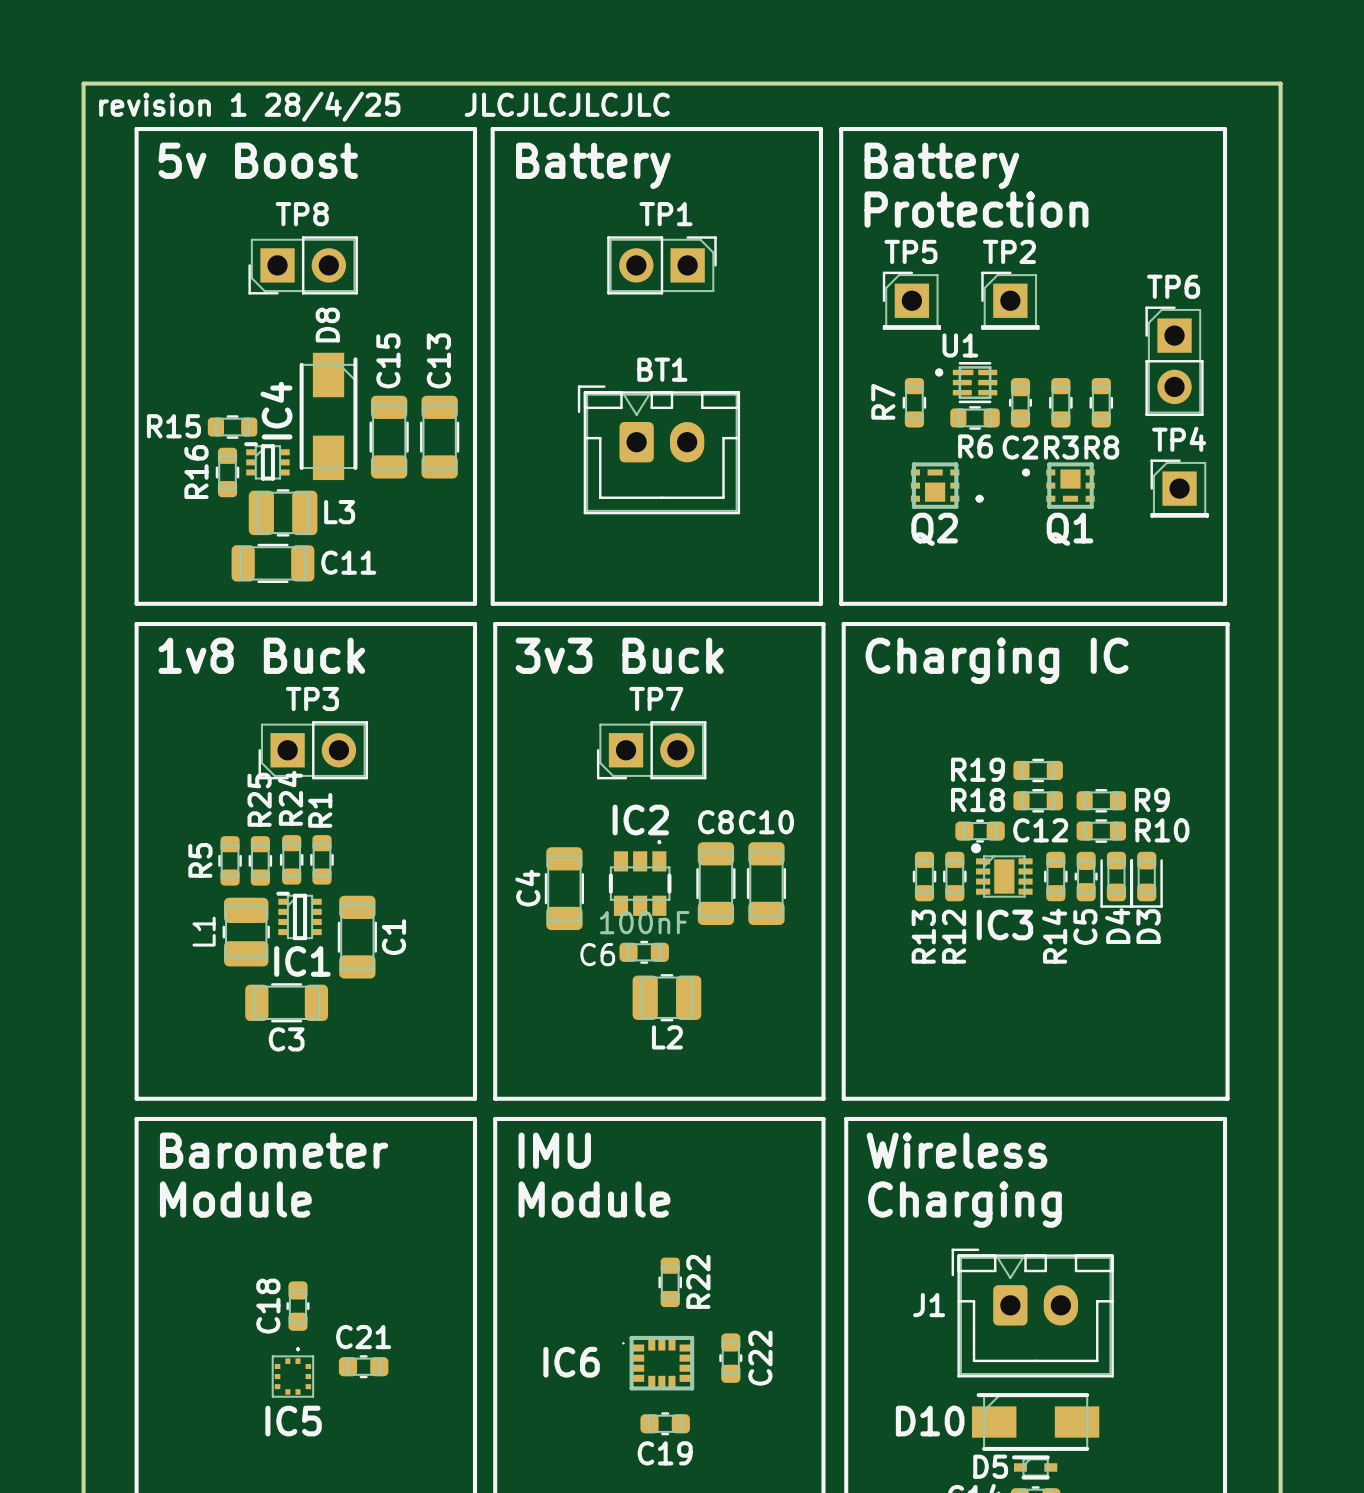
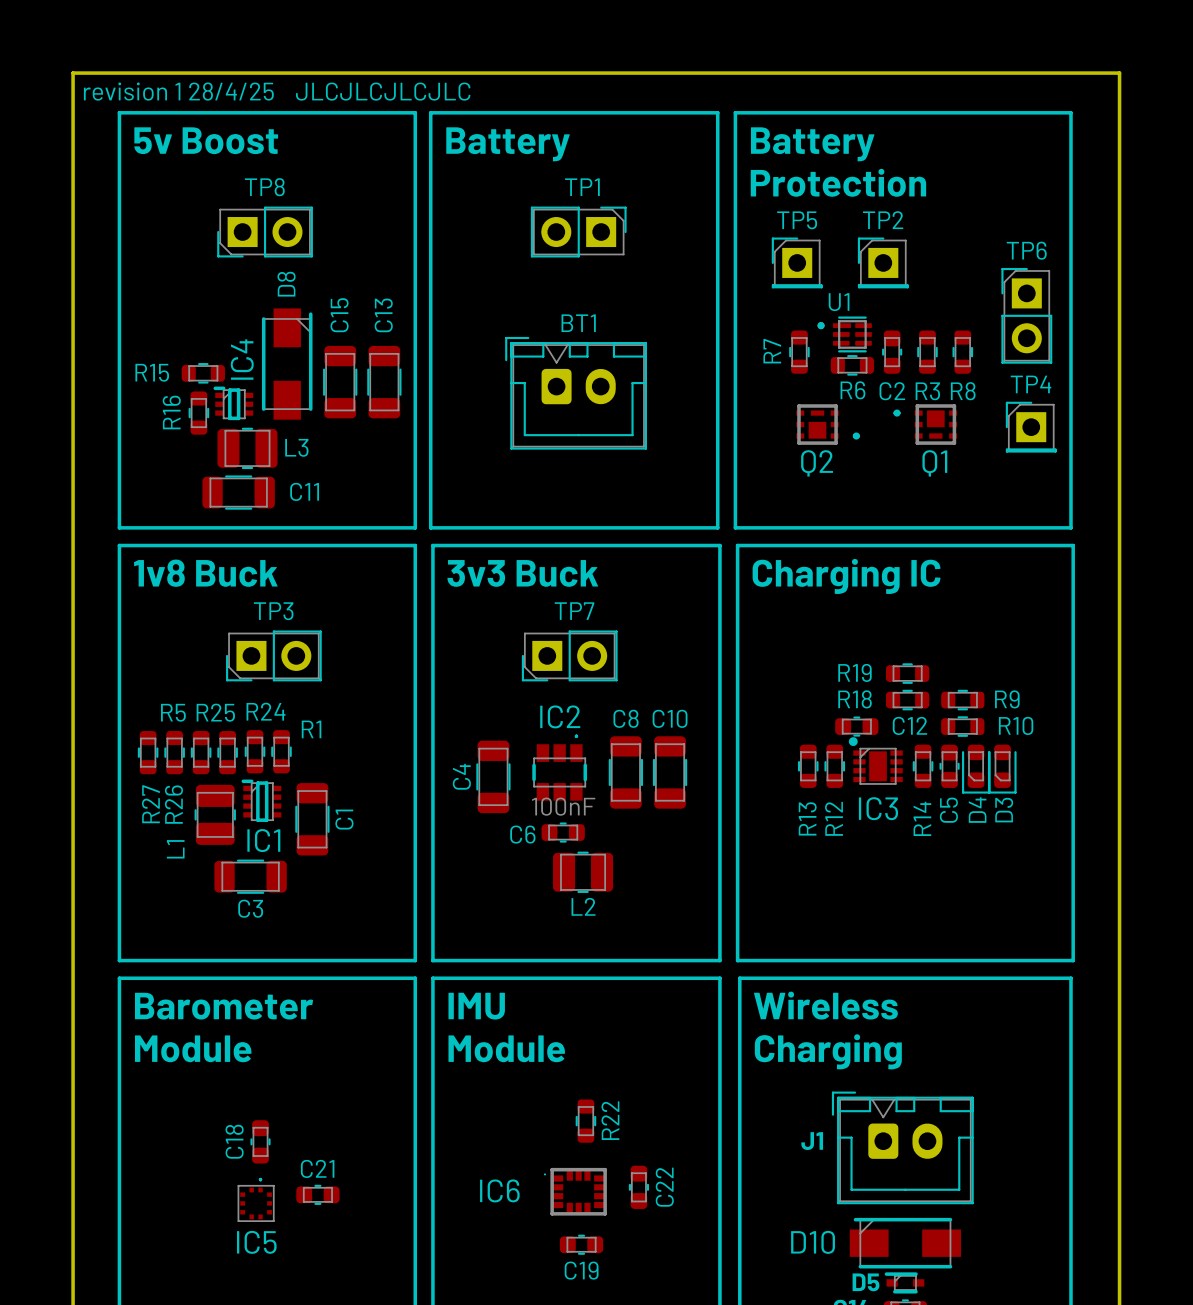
R24 name rotation: 0° (290, 798) -> 90° clockwise (266, 711)
R25 name rotation: 0° (259, 799) -> 90° clockwise (215, 712)
R1 name rotation: 0° (320, 810) -> 90° clockwise (311, 729)
R27: none -> (148, 752)
R26: none -> (174, 752)
R5 name rotation: 0° (200, 860) -> 90° clockwise (173, 712)
L1 name position: L1 (204, 931) -> L1 (175, 849)

